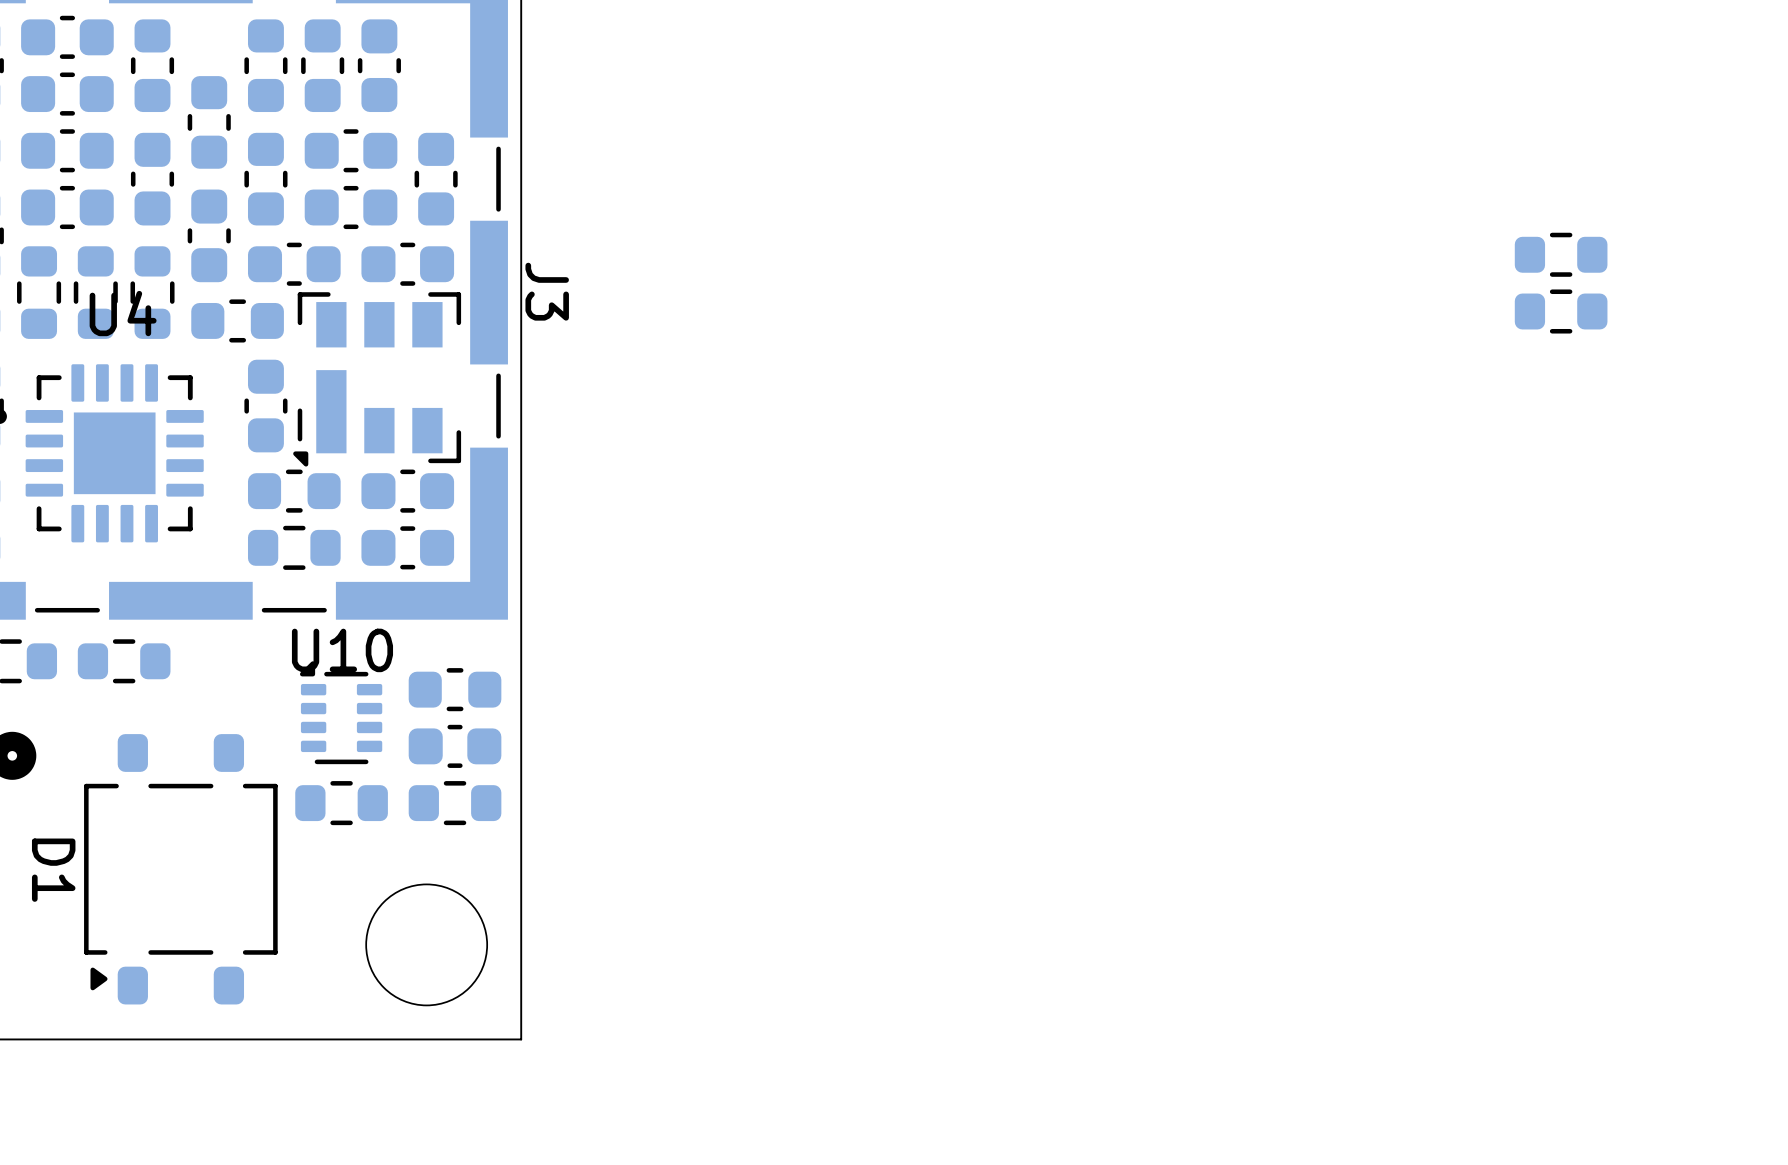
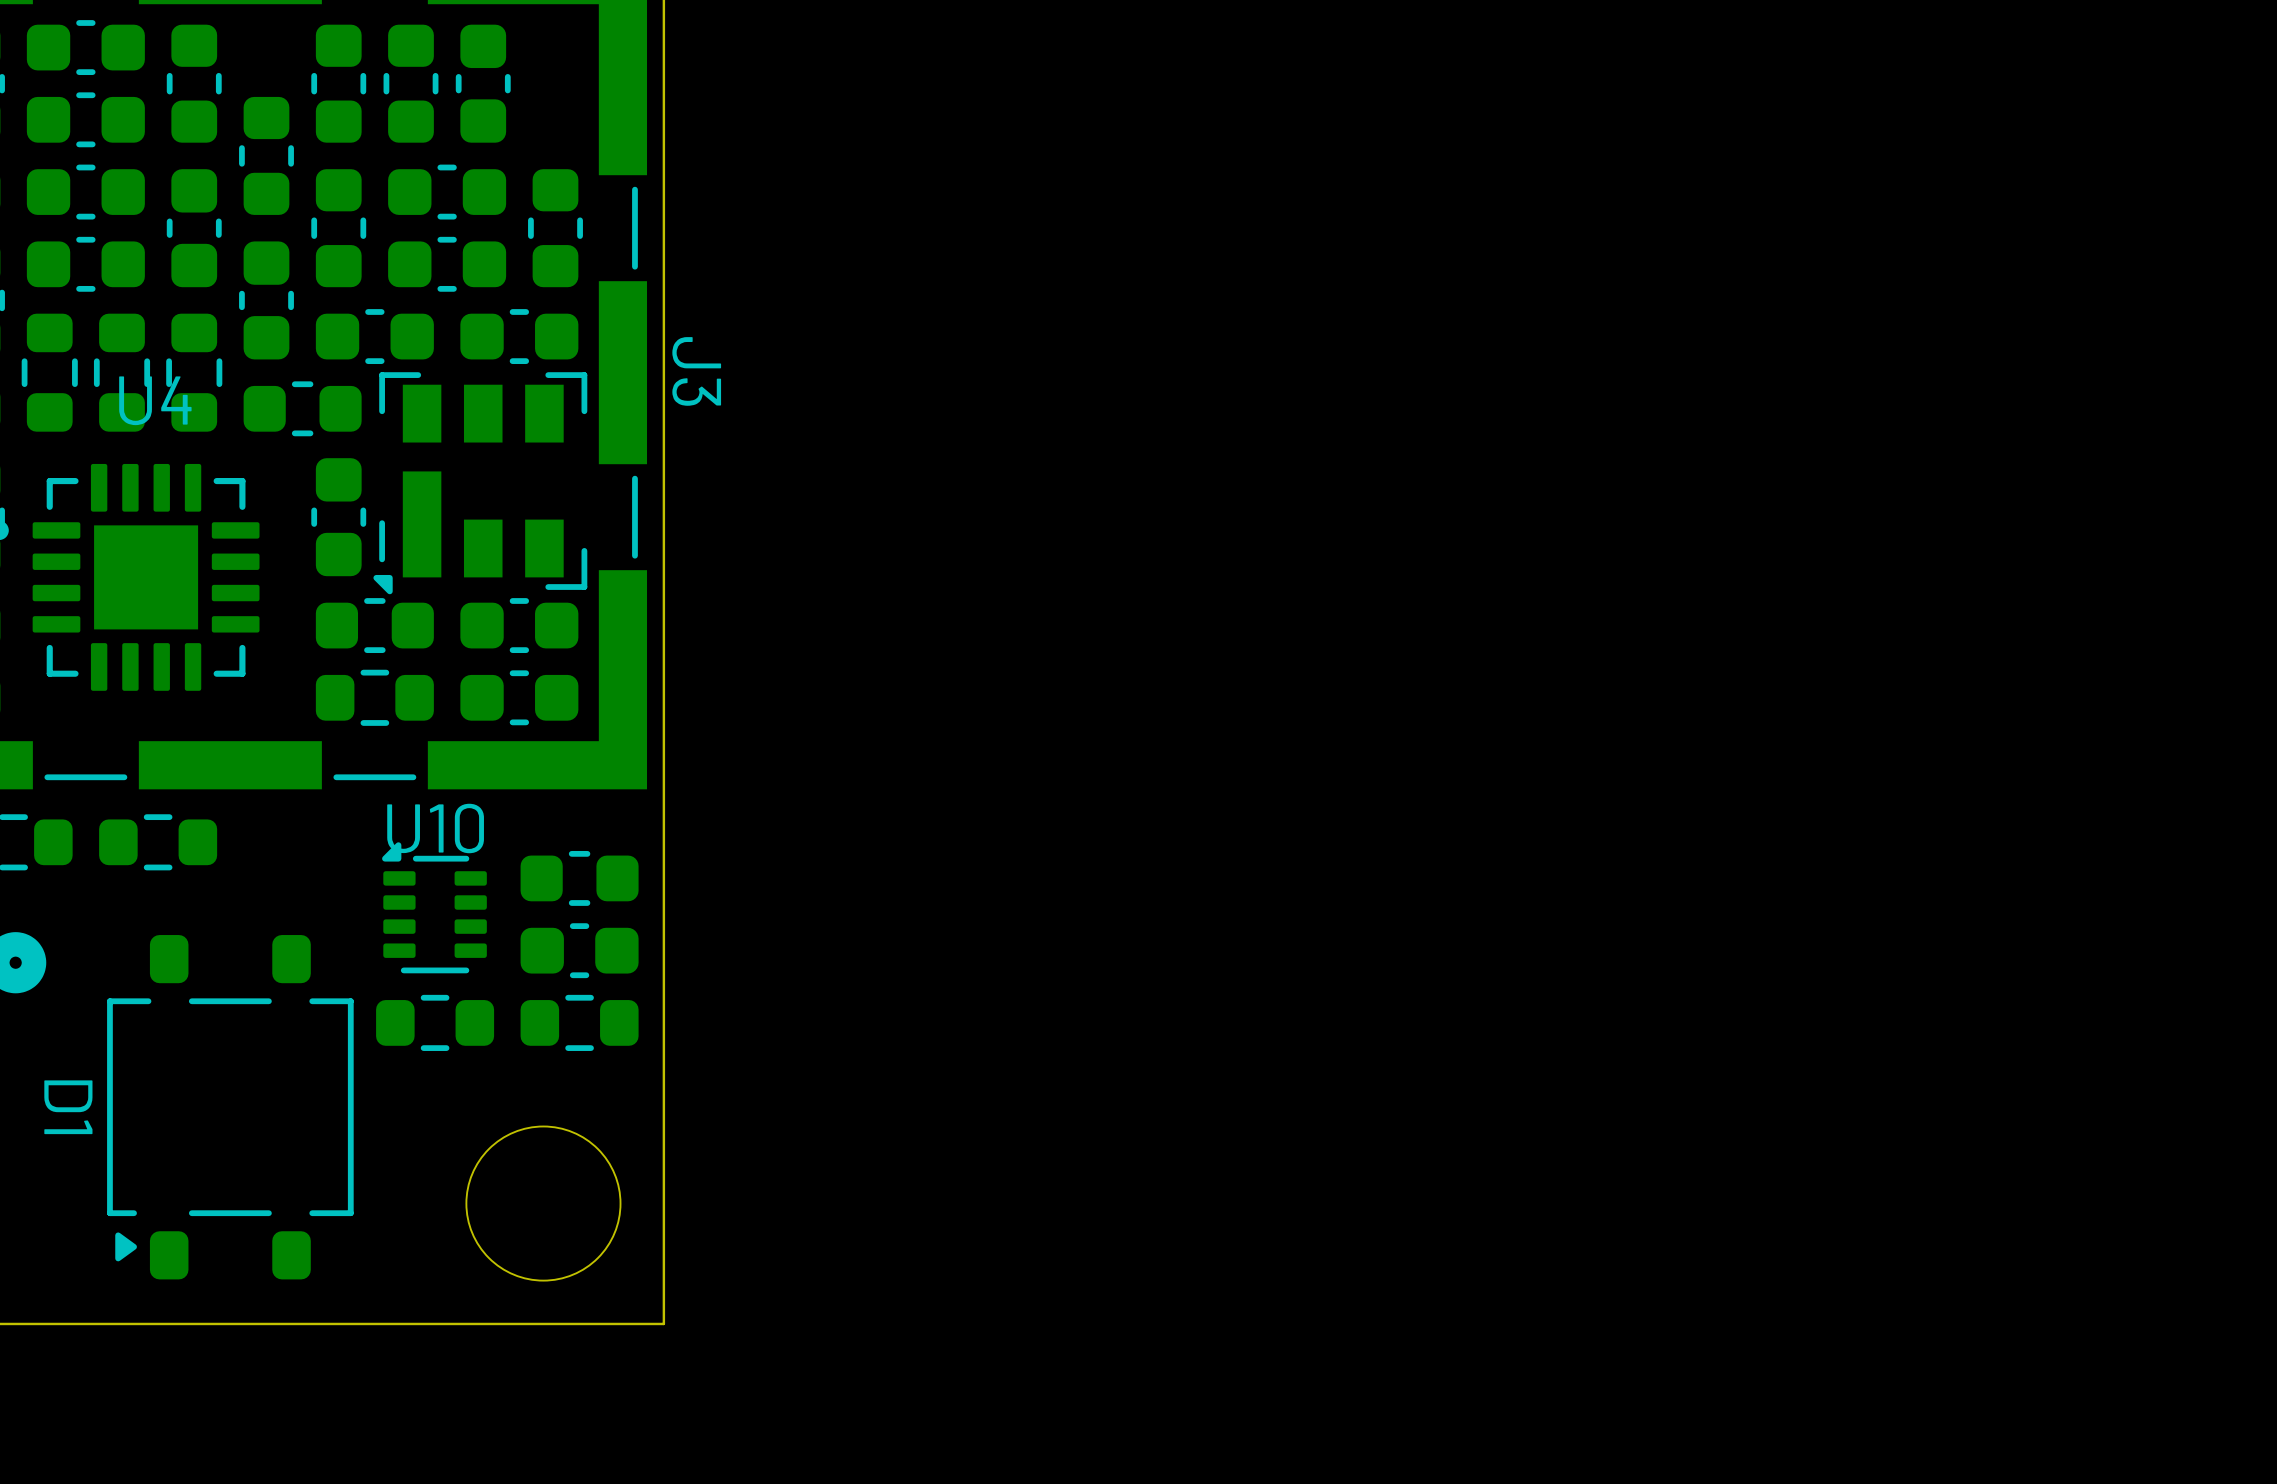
part: (1561, 254) -> none
part: (1561, 311) -> none

